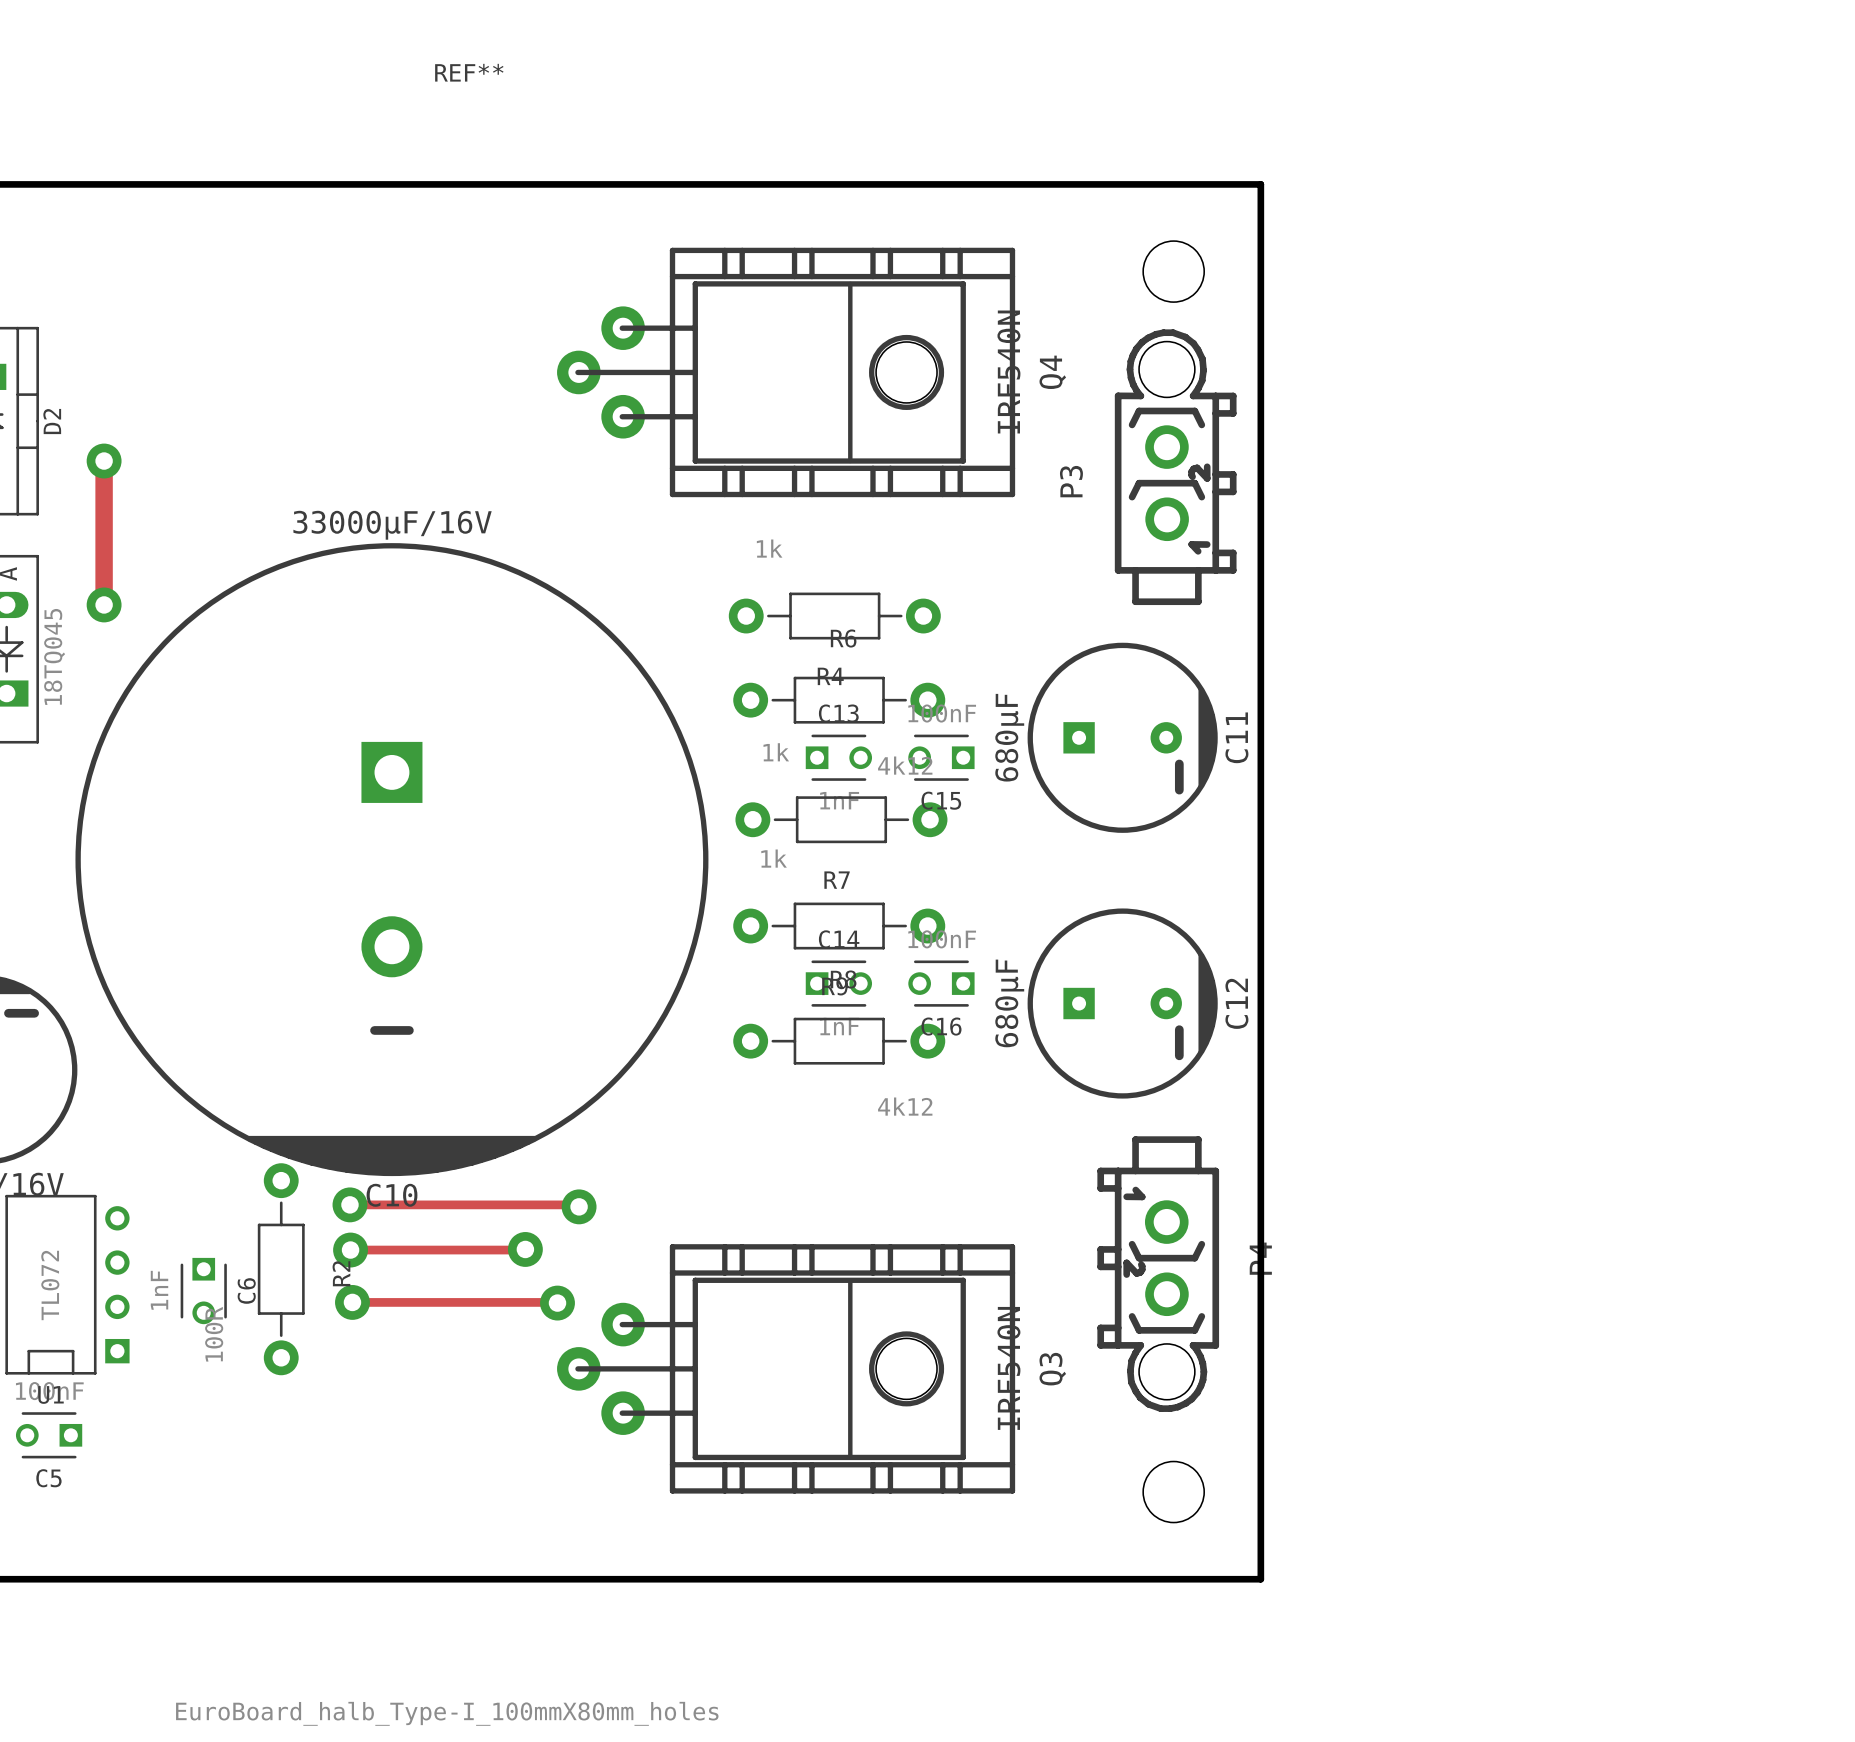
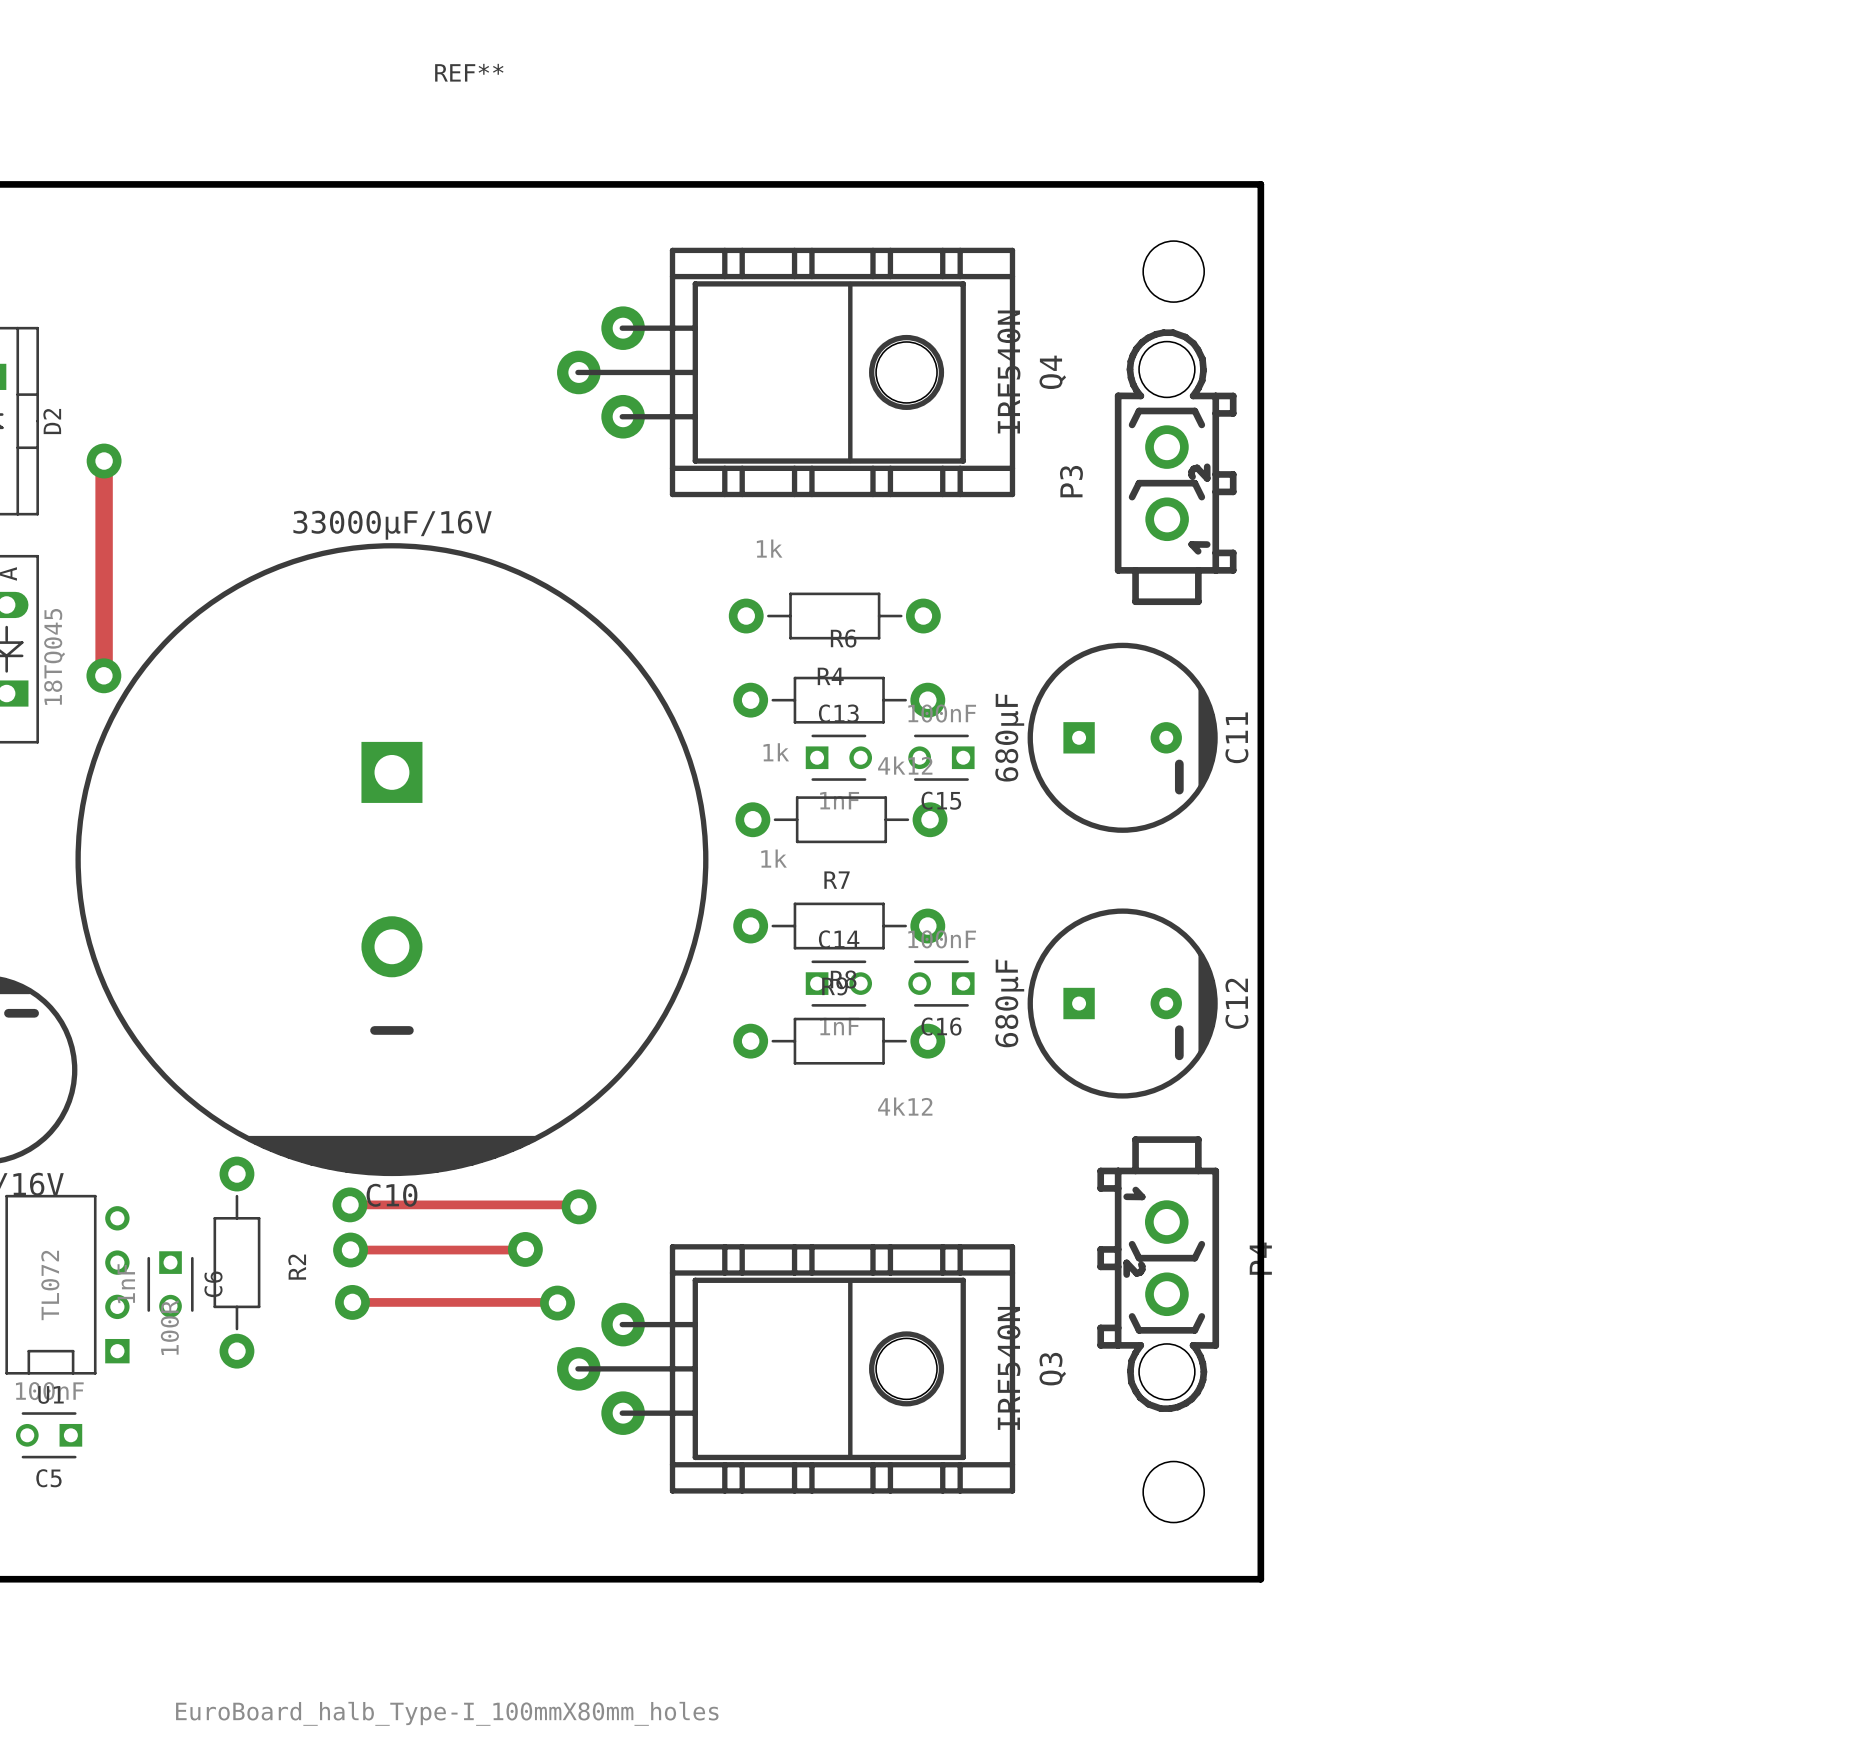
track: none -> (104, 604) (104, 675)
via position: (104, 604) -> (103, 675)
R2 position: (281, 1269) -> (236, 1262)
C6 position: (203, 1291) -> (170, 1284)

